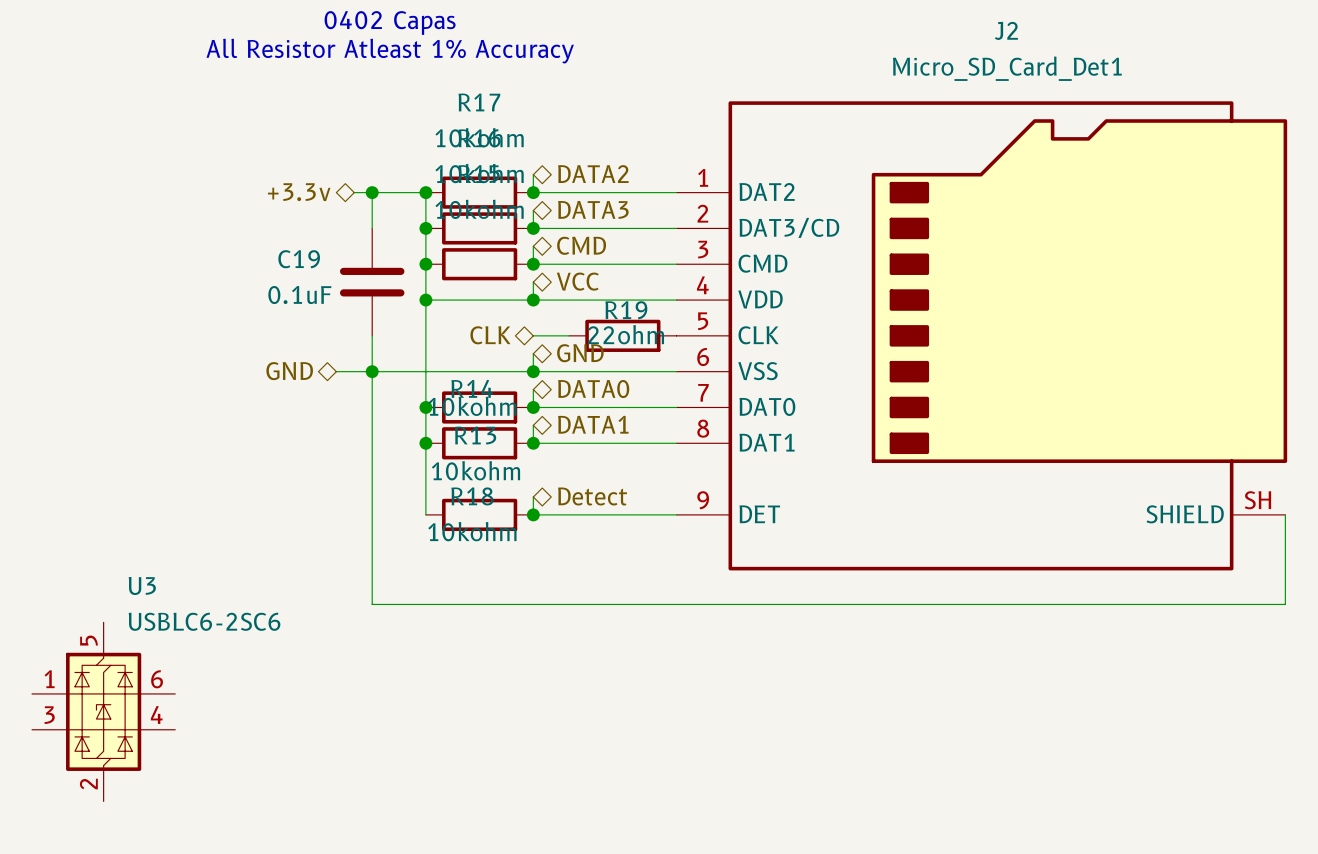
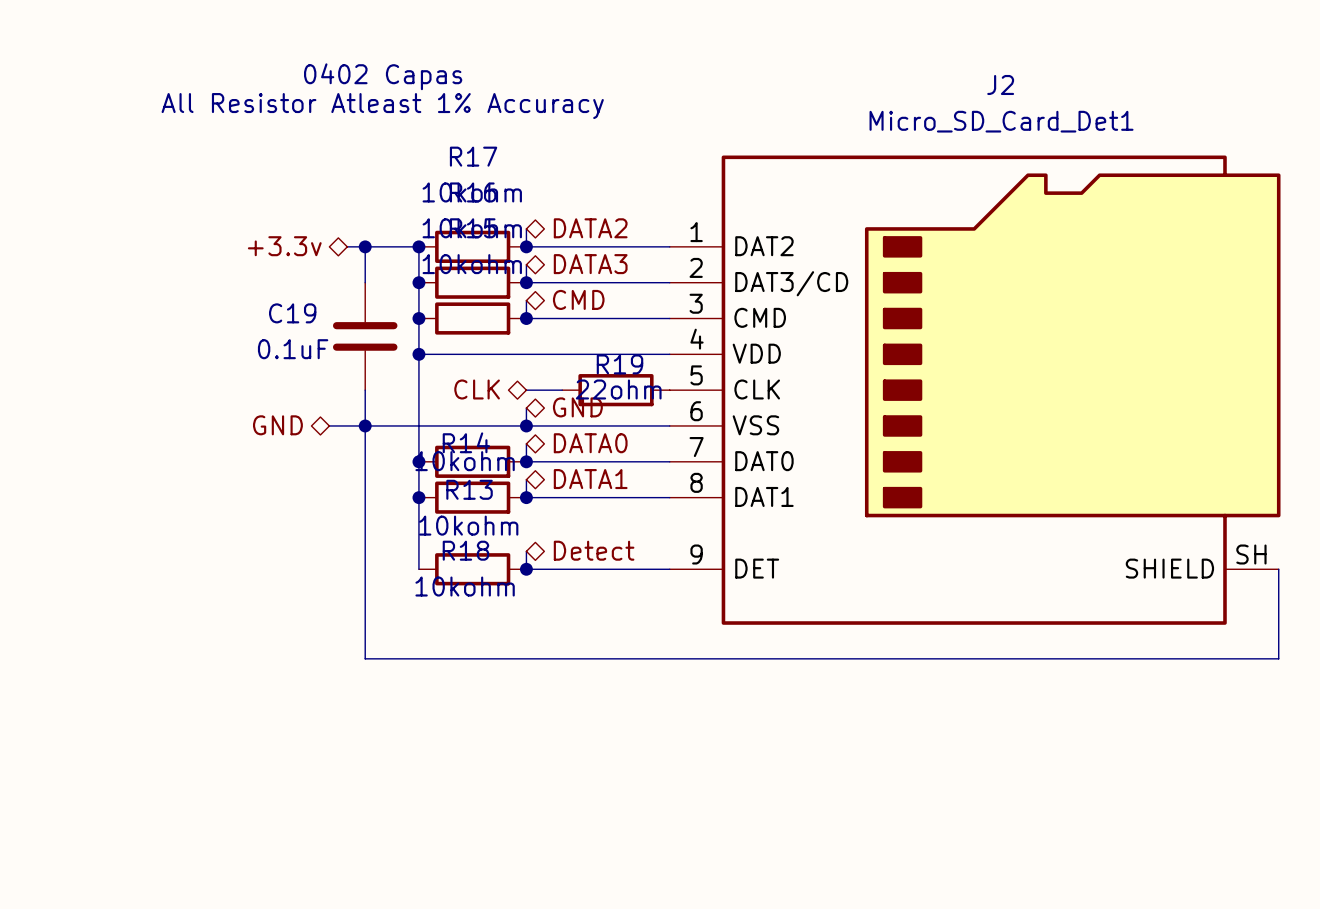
hierarchical label: VCC (577, 281) -> none
wire: (533, 282) (533, 300) -> none
junction: (533, 300) -> none
U3: USBLC6-2SC6 (103, 711) -> none

